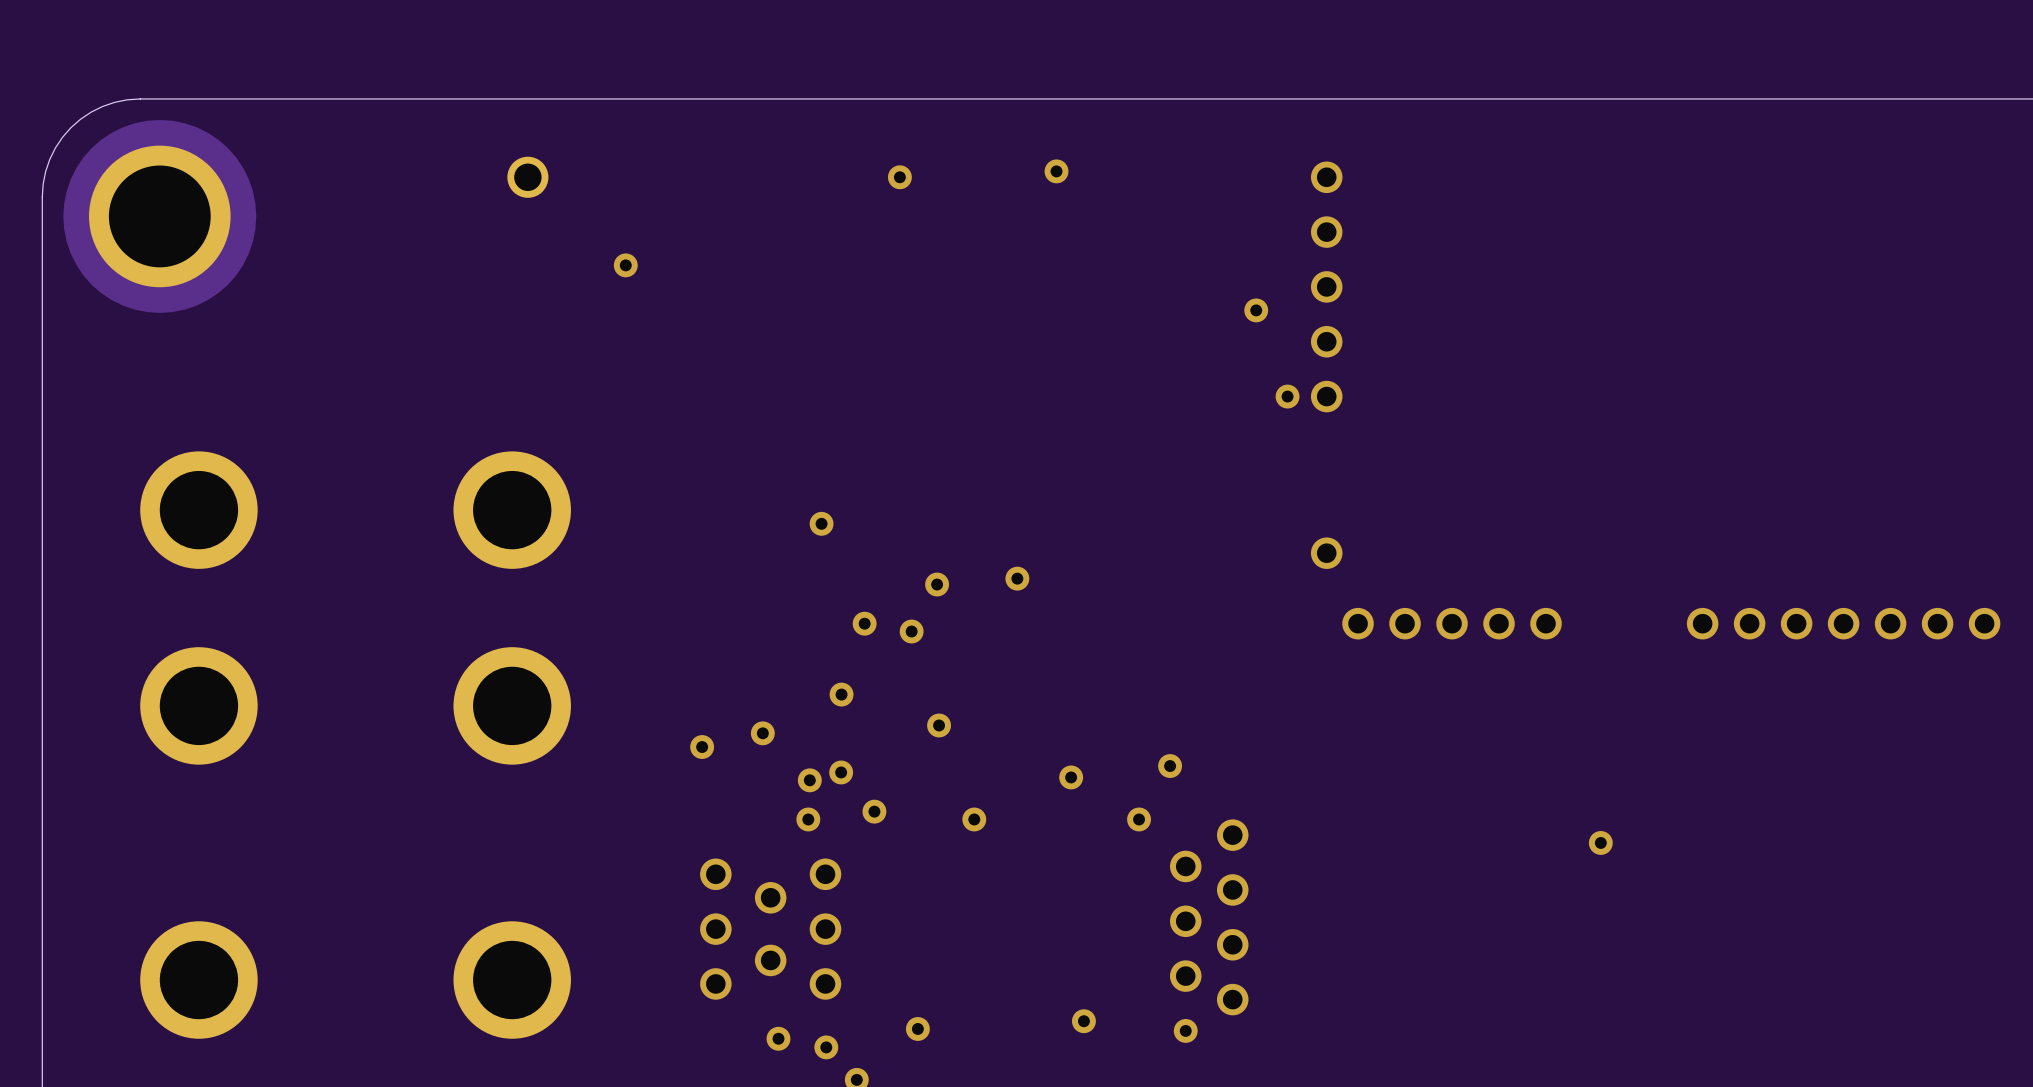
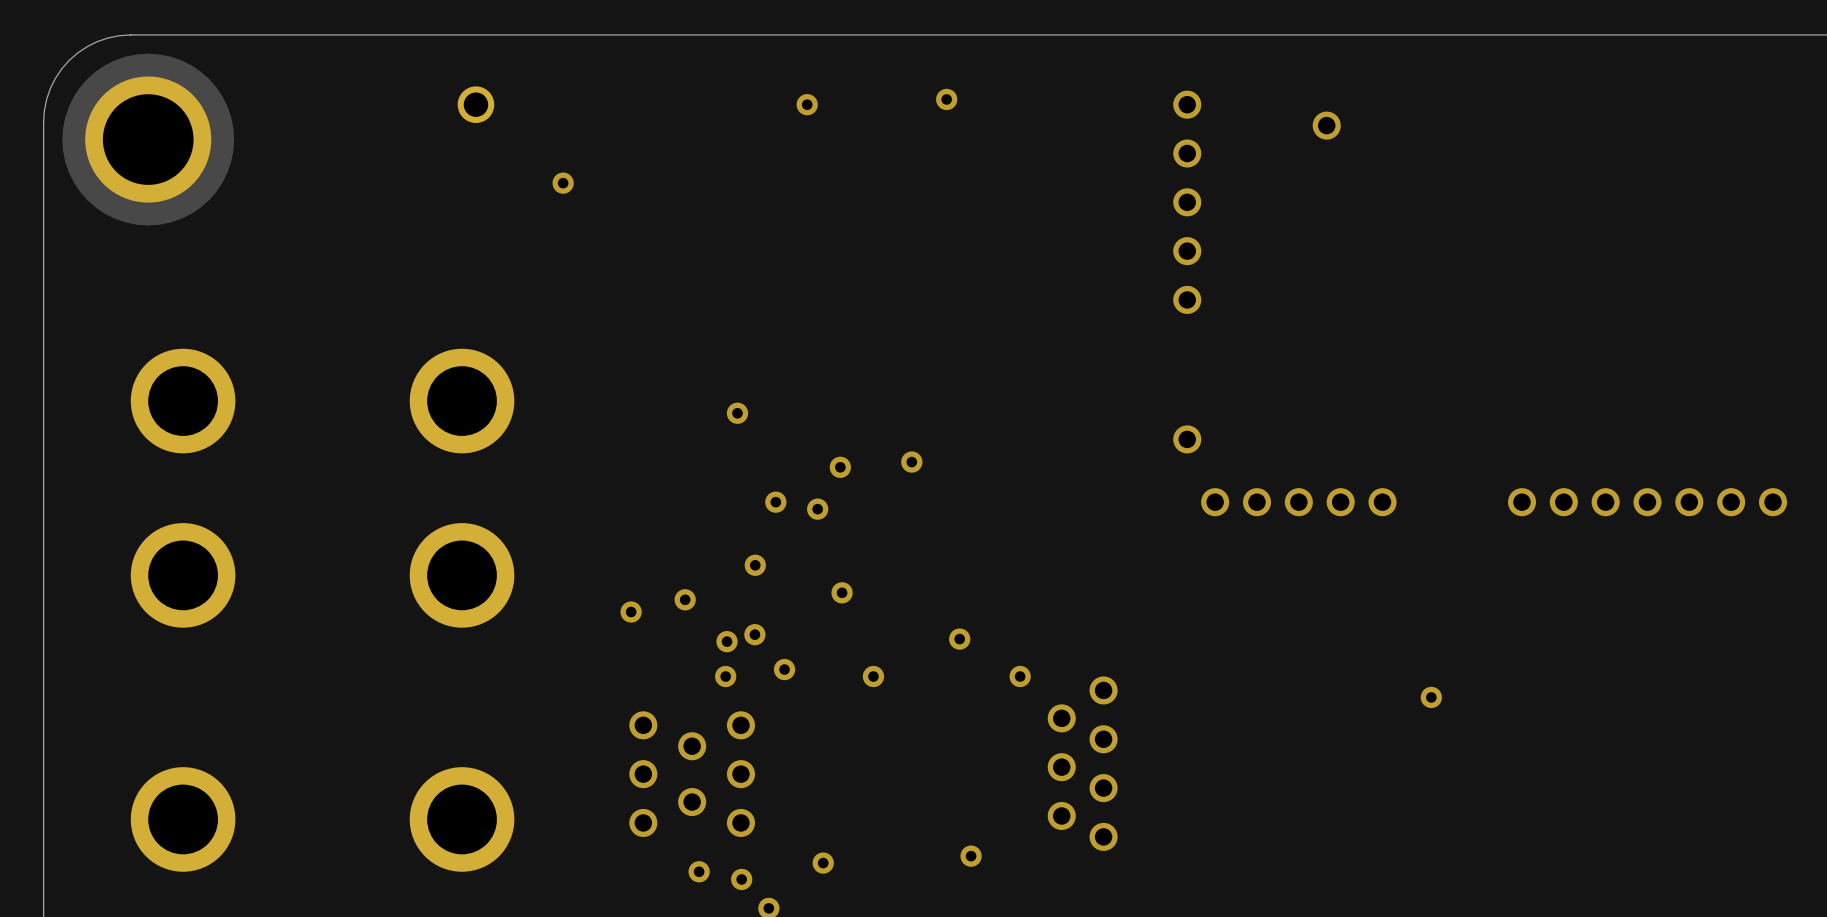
via: none -> (1326, 125)
via: (1256, 310) -> none
via: (1287, 396) -> none
via: (1170, 766) -> none
via: (1185, 1030) -> none

